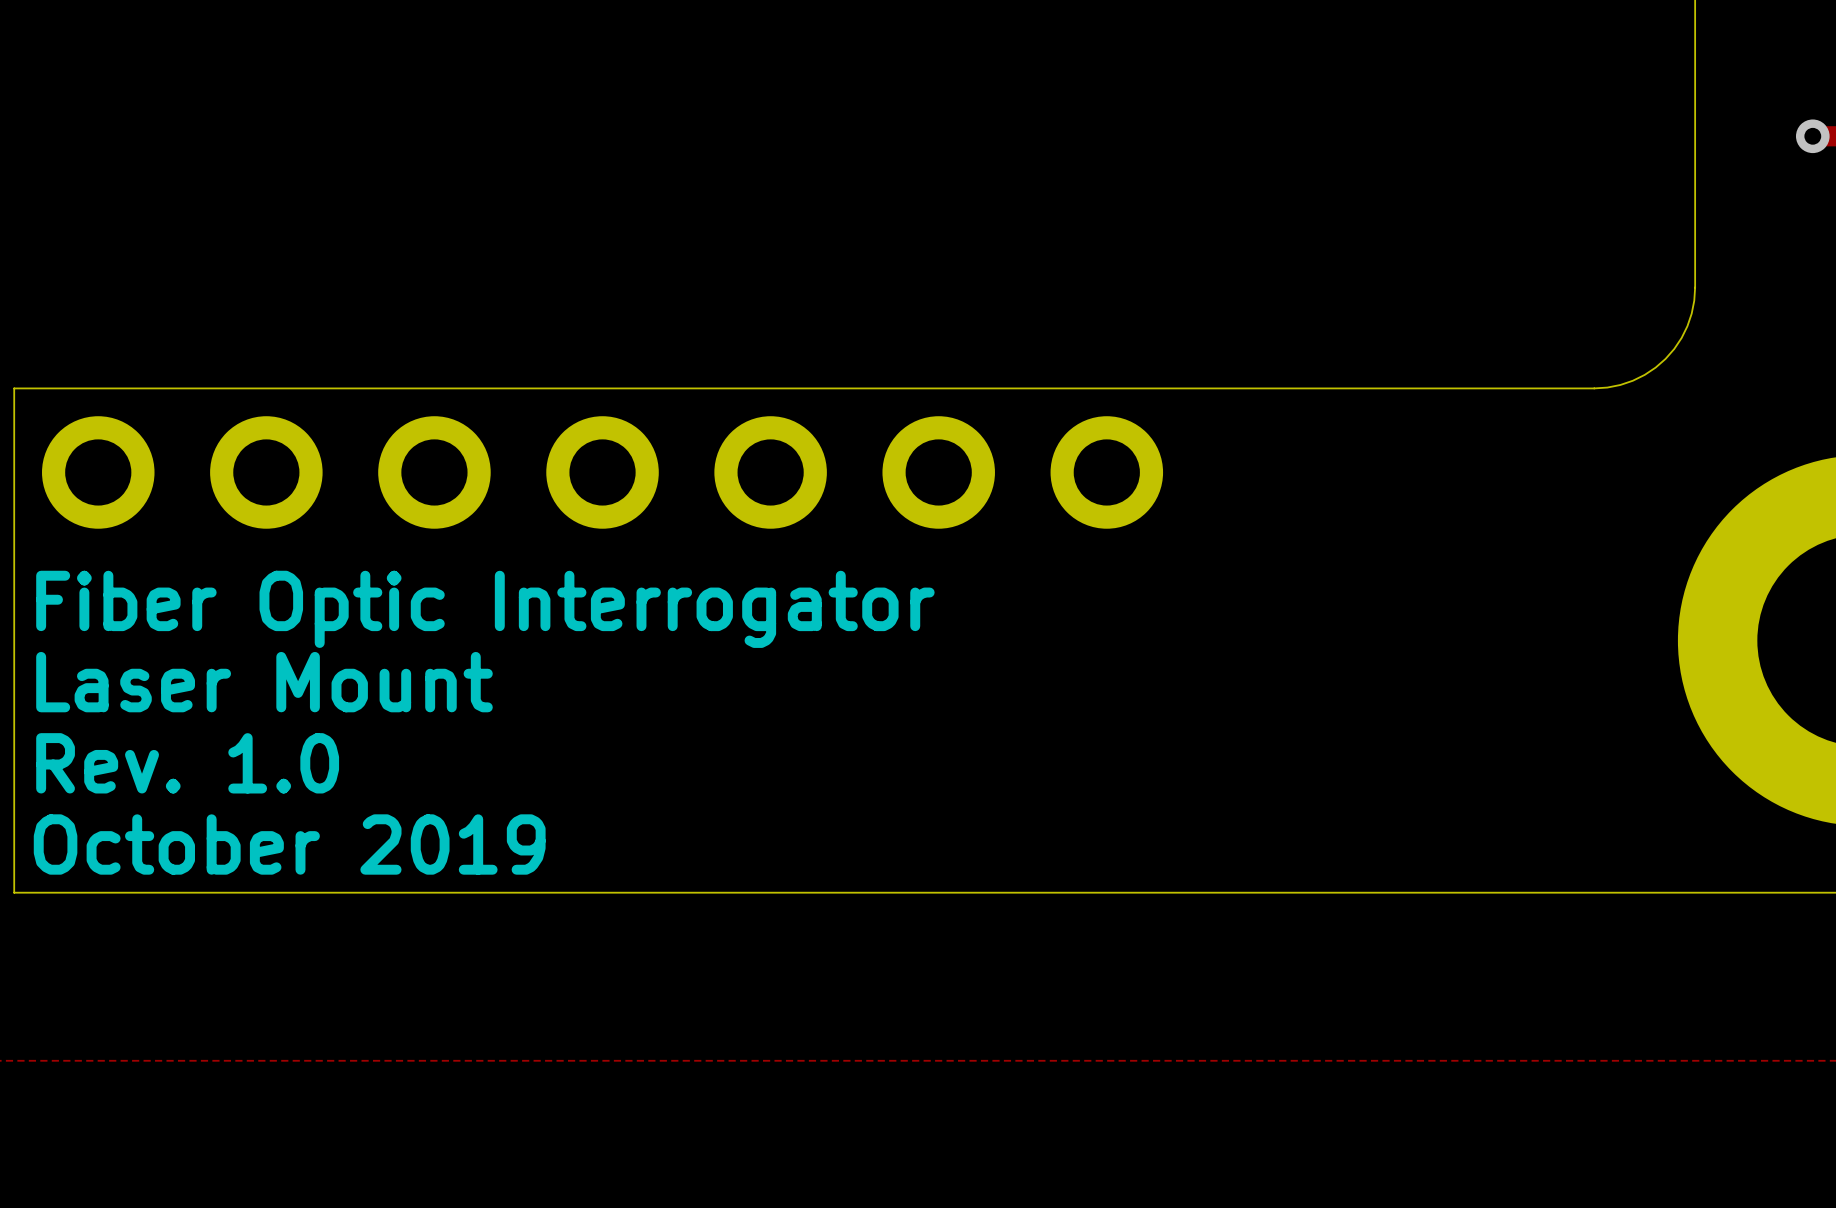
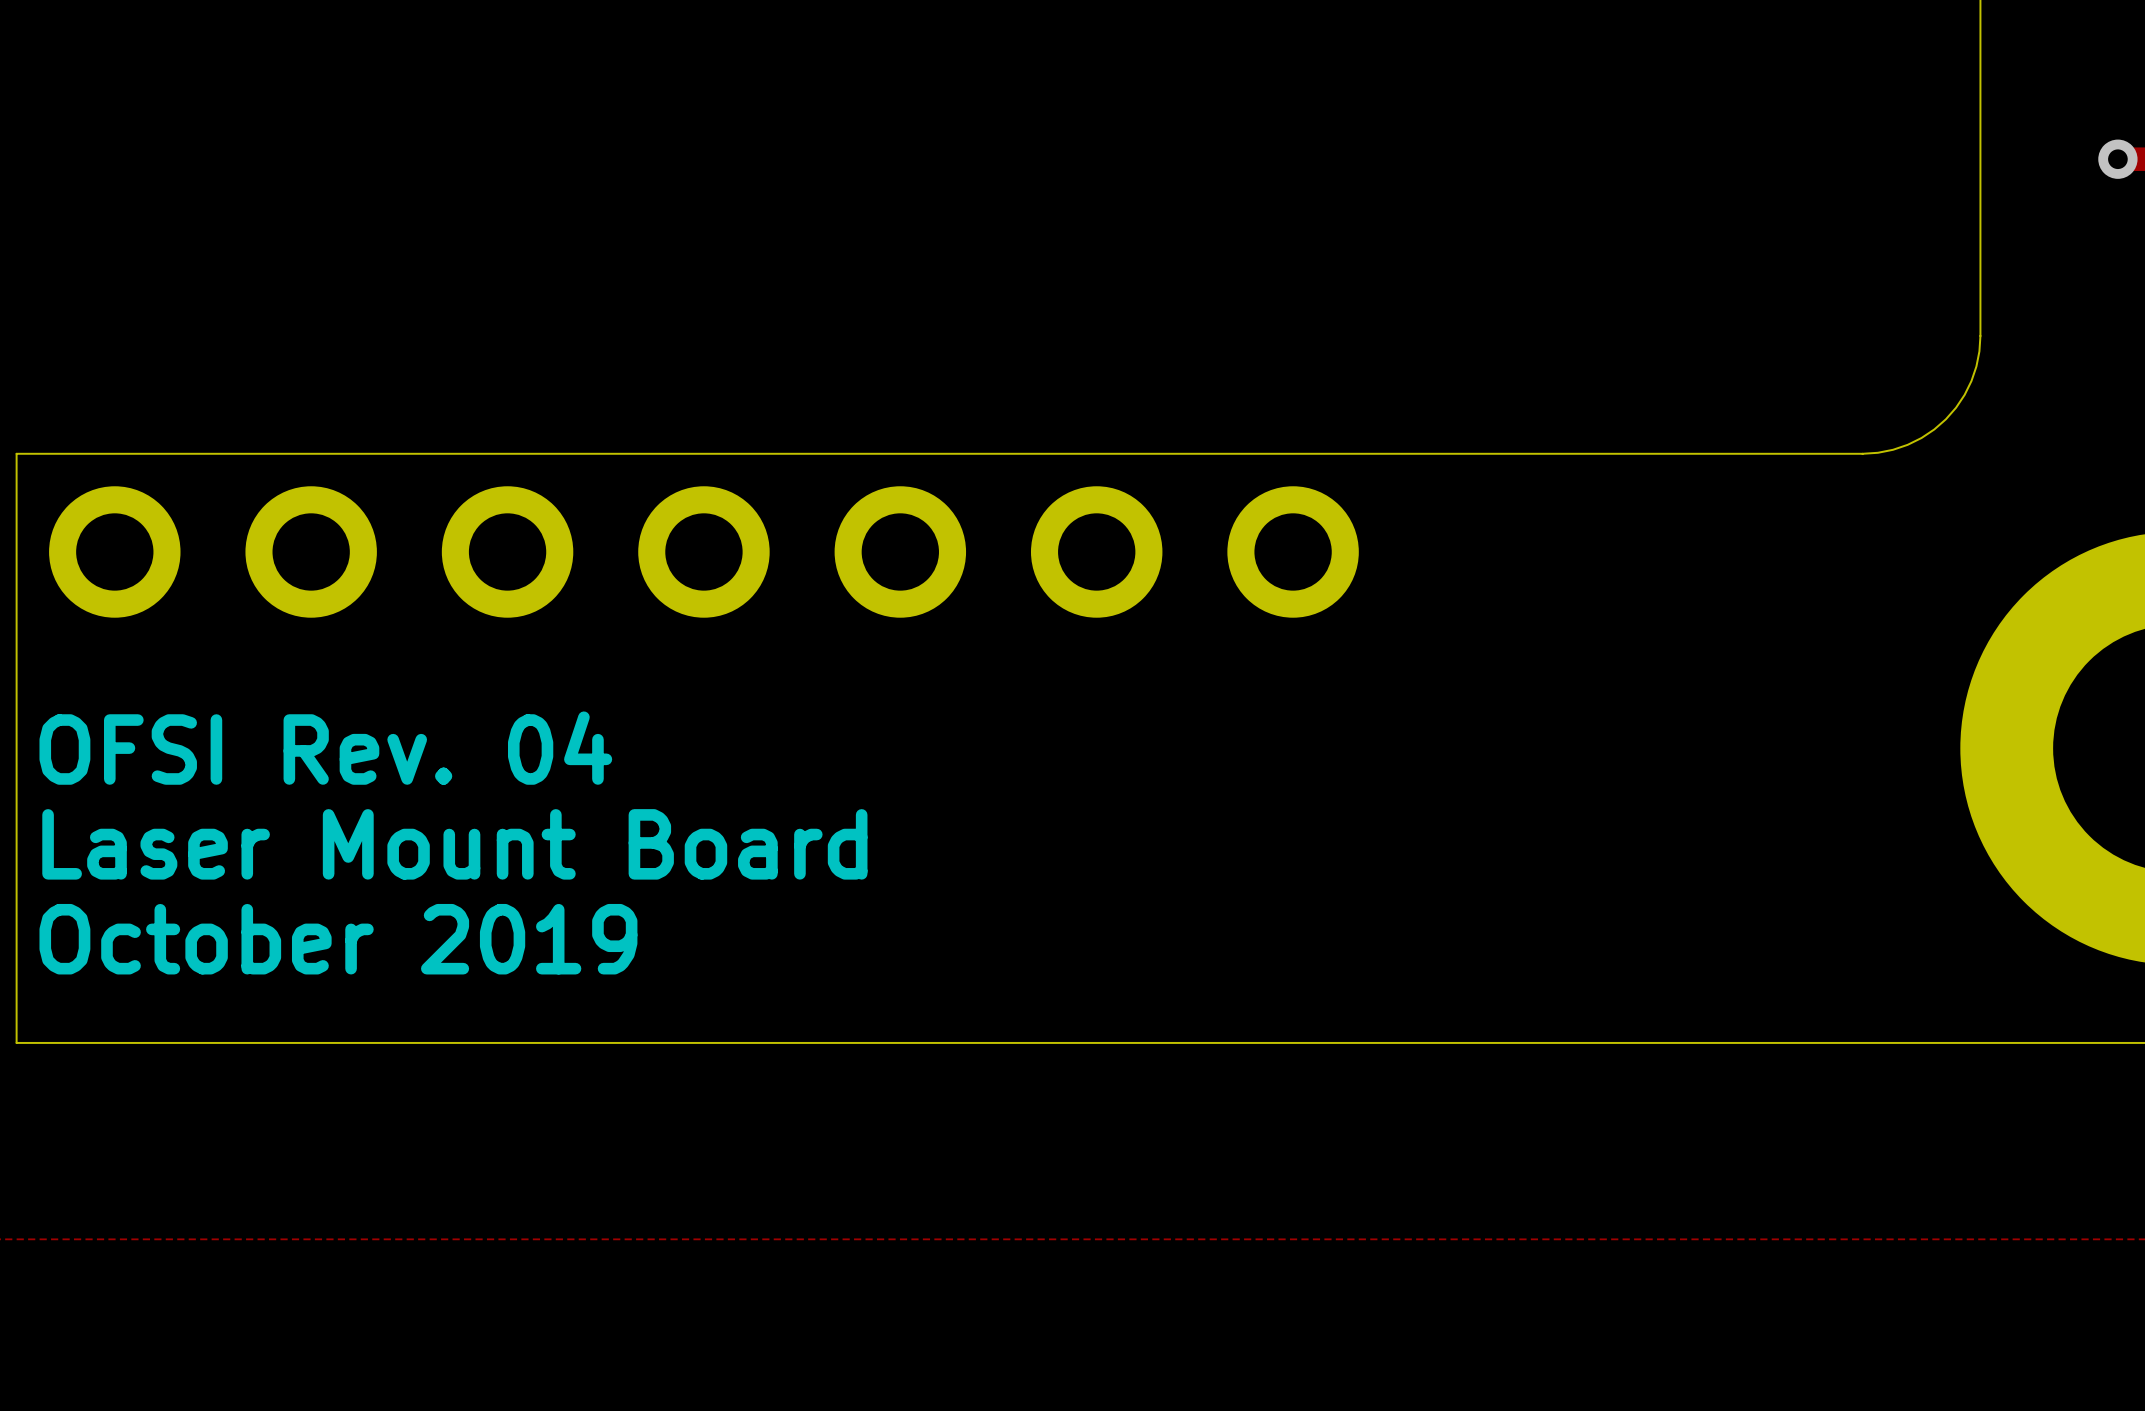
text: Fiber Optic Interrogator (485, 609) -> none
text: none -> OFSI Rev. 04 (325, 748)
text: Laser Mount (264, 682) -> Laser Mount Board (454, 844)
text: Rev. 1.0 (187, 763) -> none
text position: October 2019 (289, 844) -> October 2019 (338, 939)

